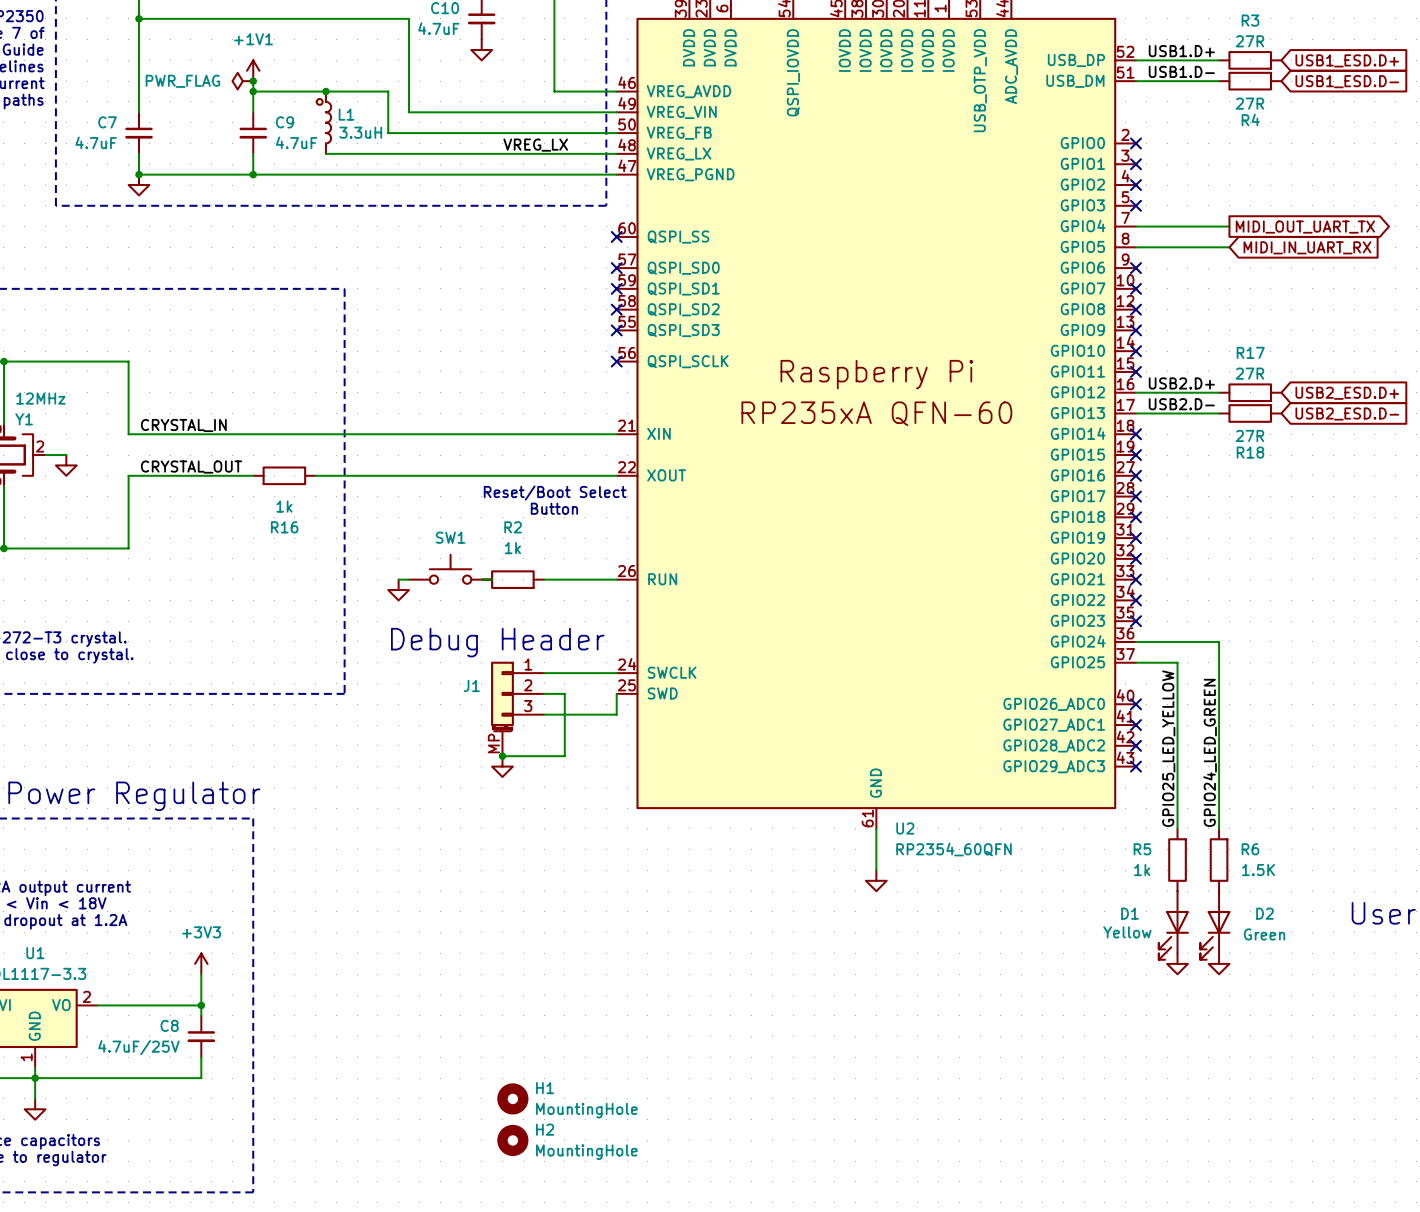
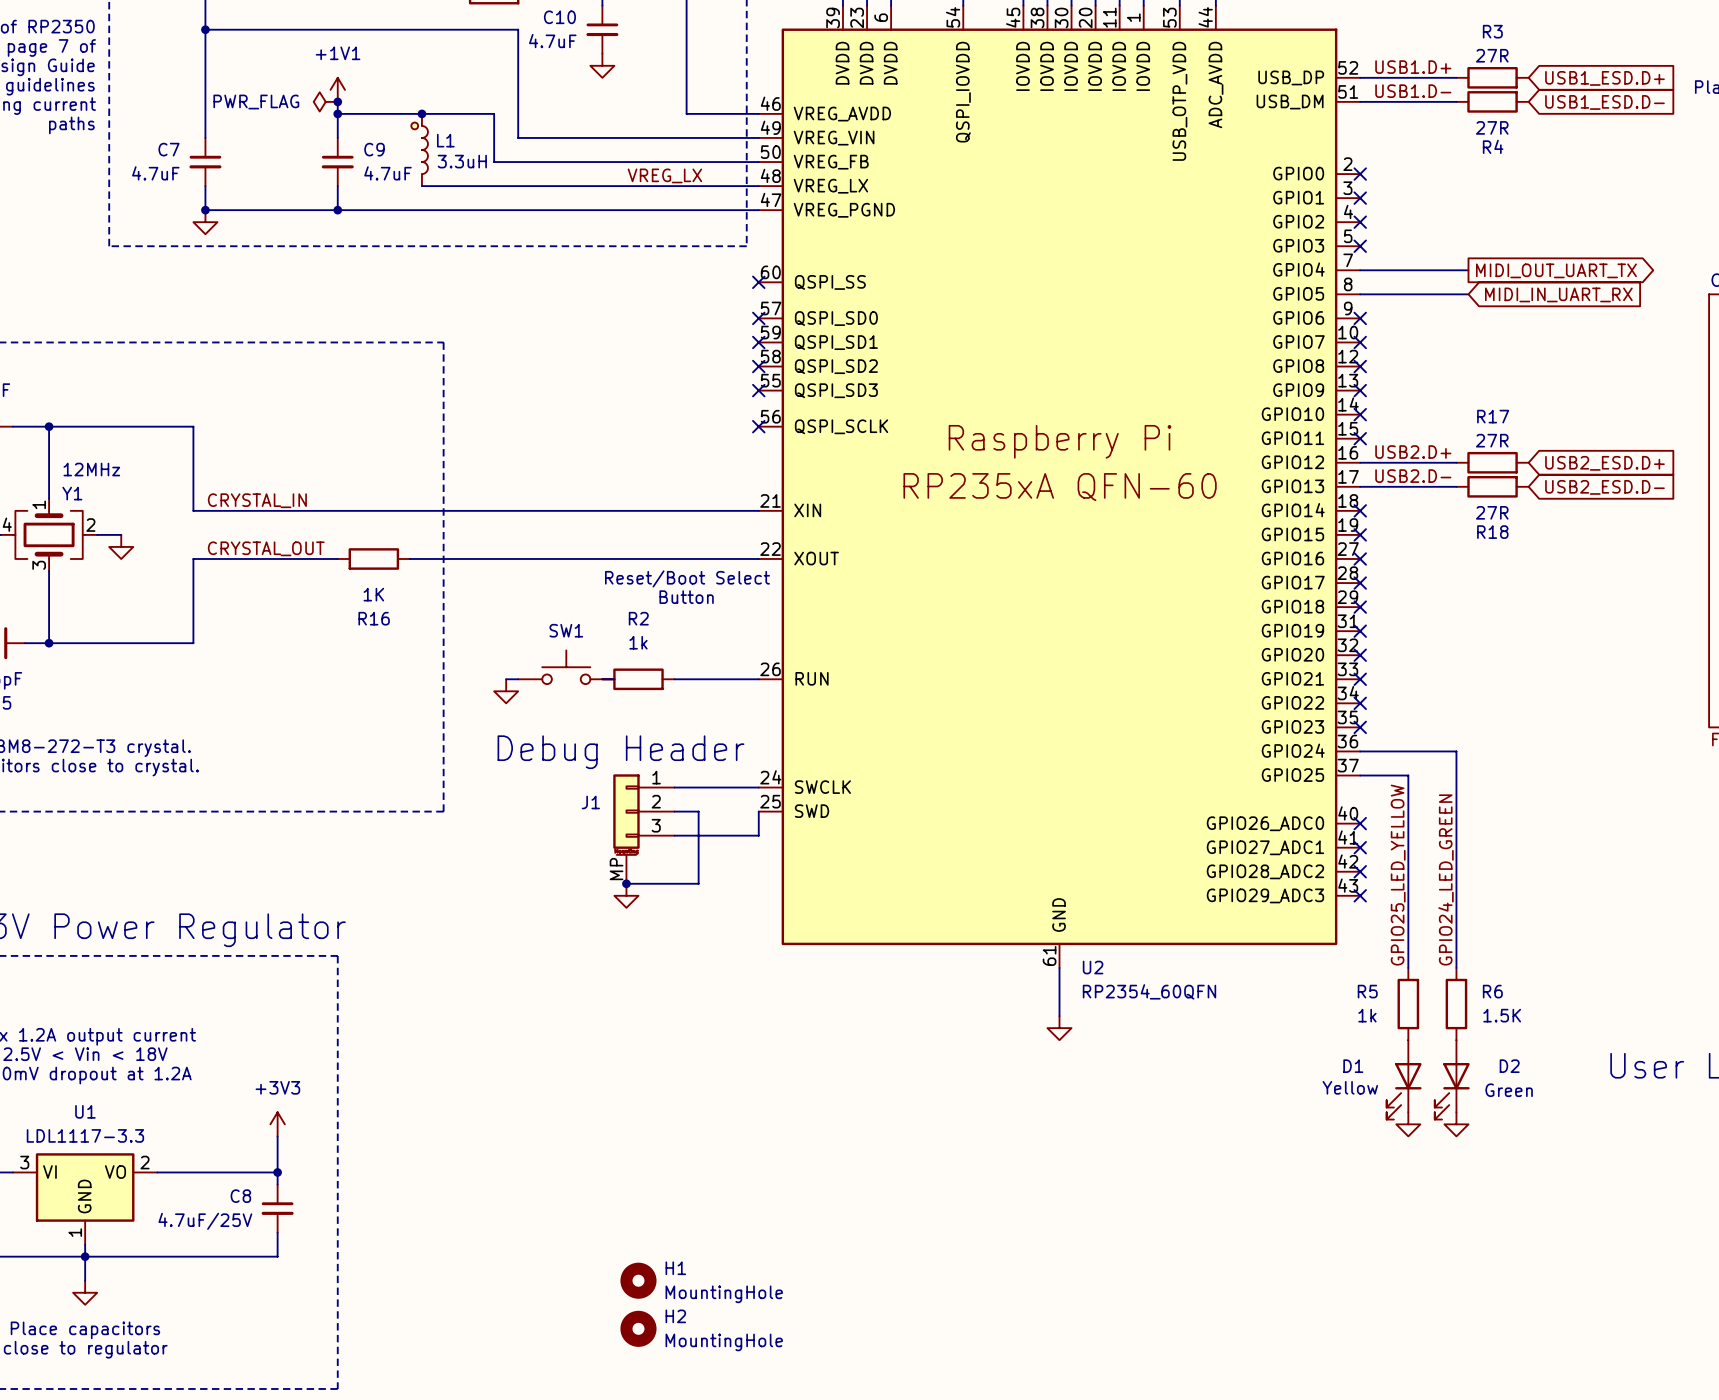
R16 text: 1k (284, 506) -> 1K (373, 594)

